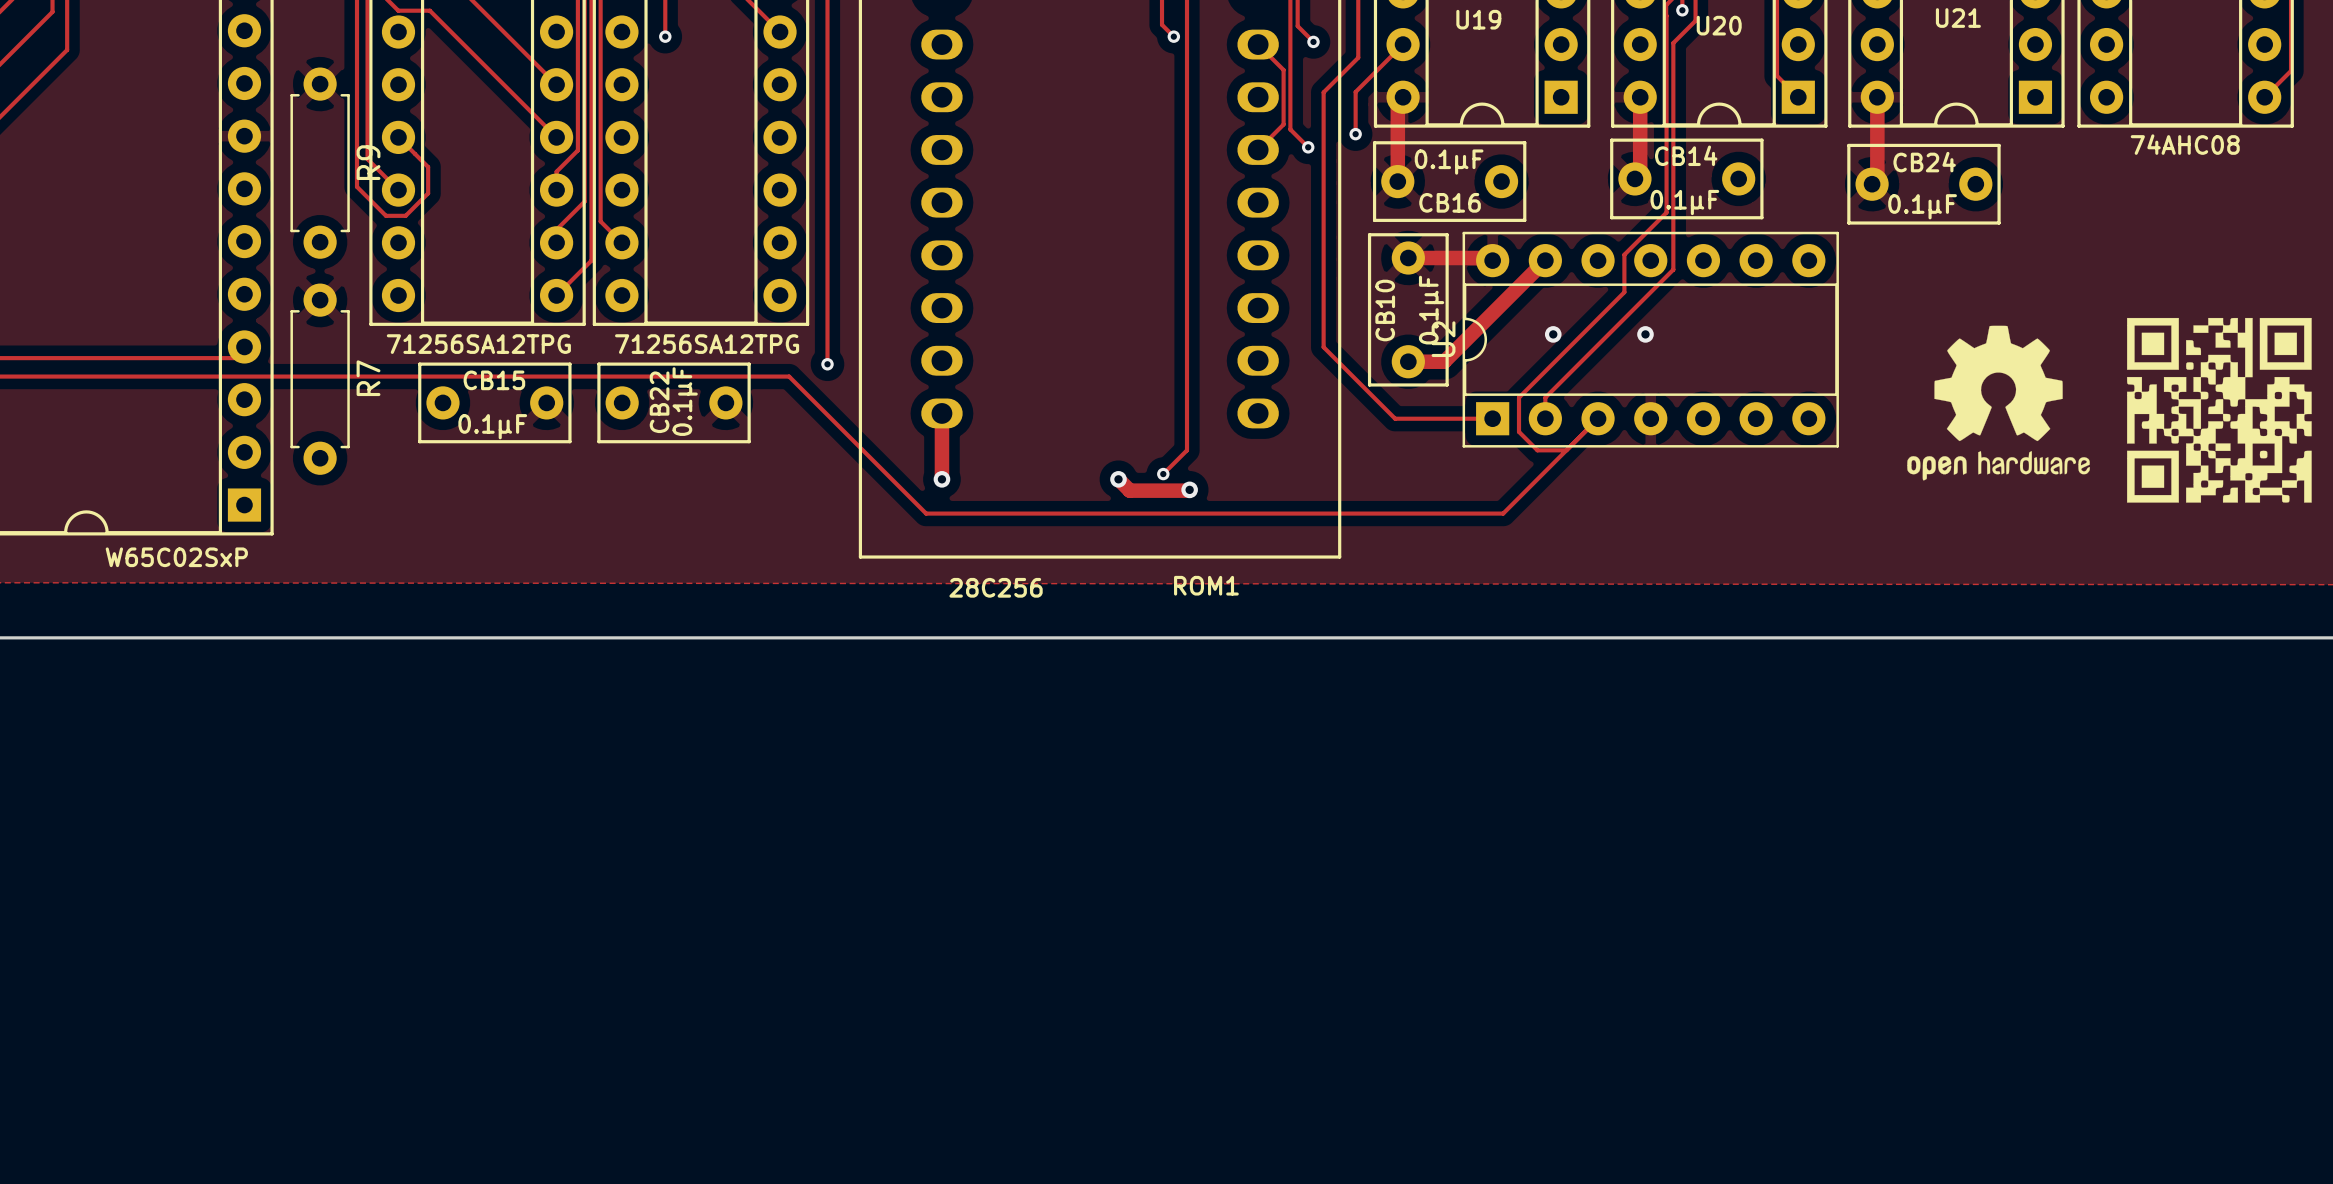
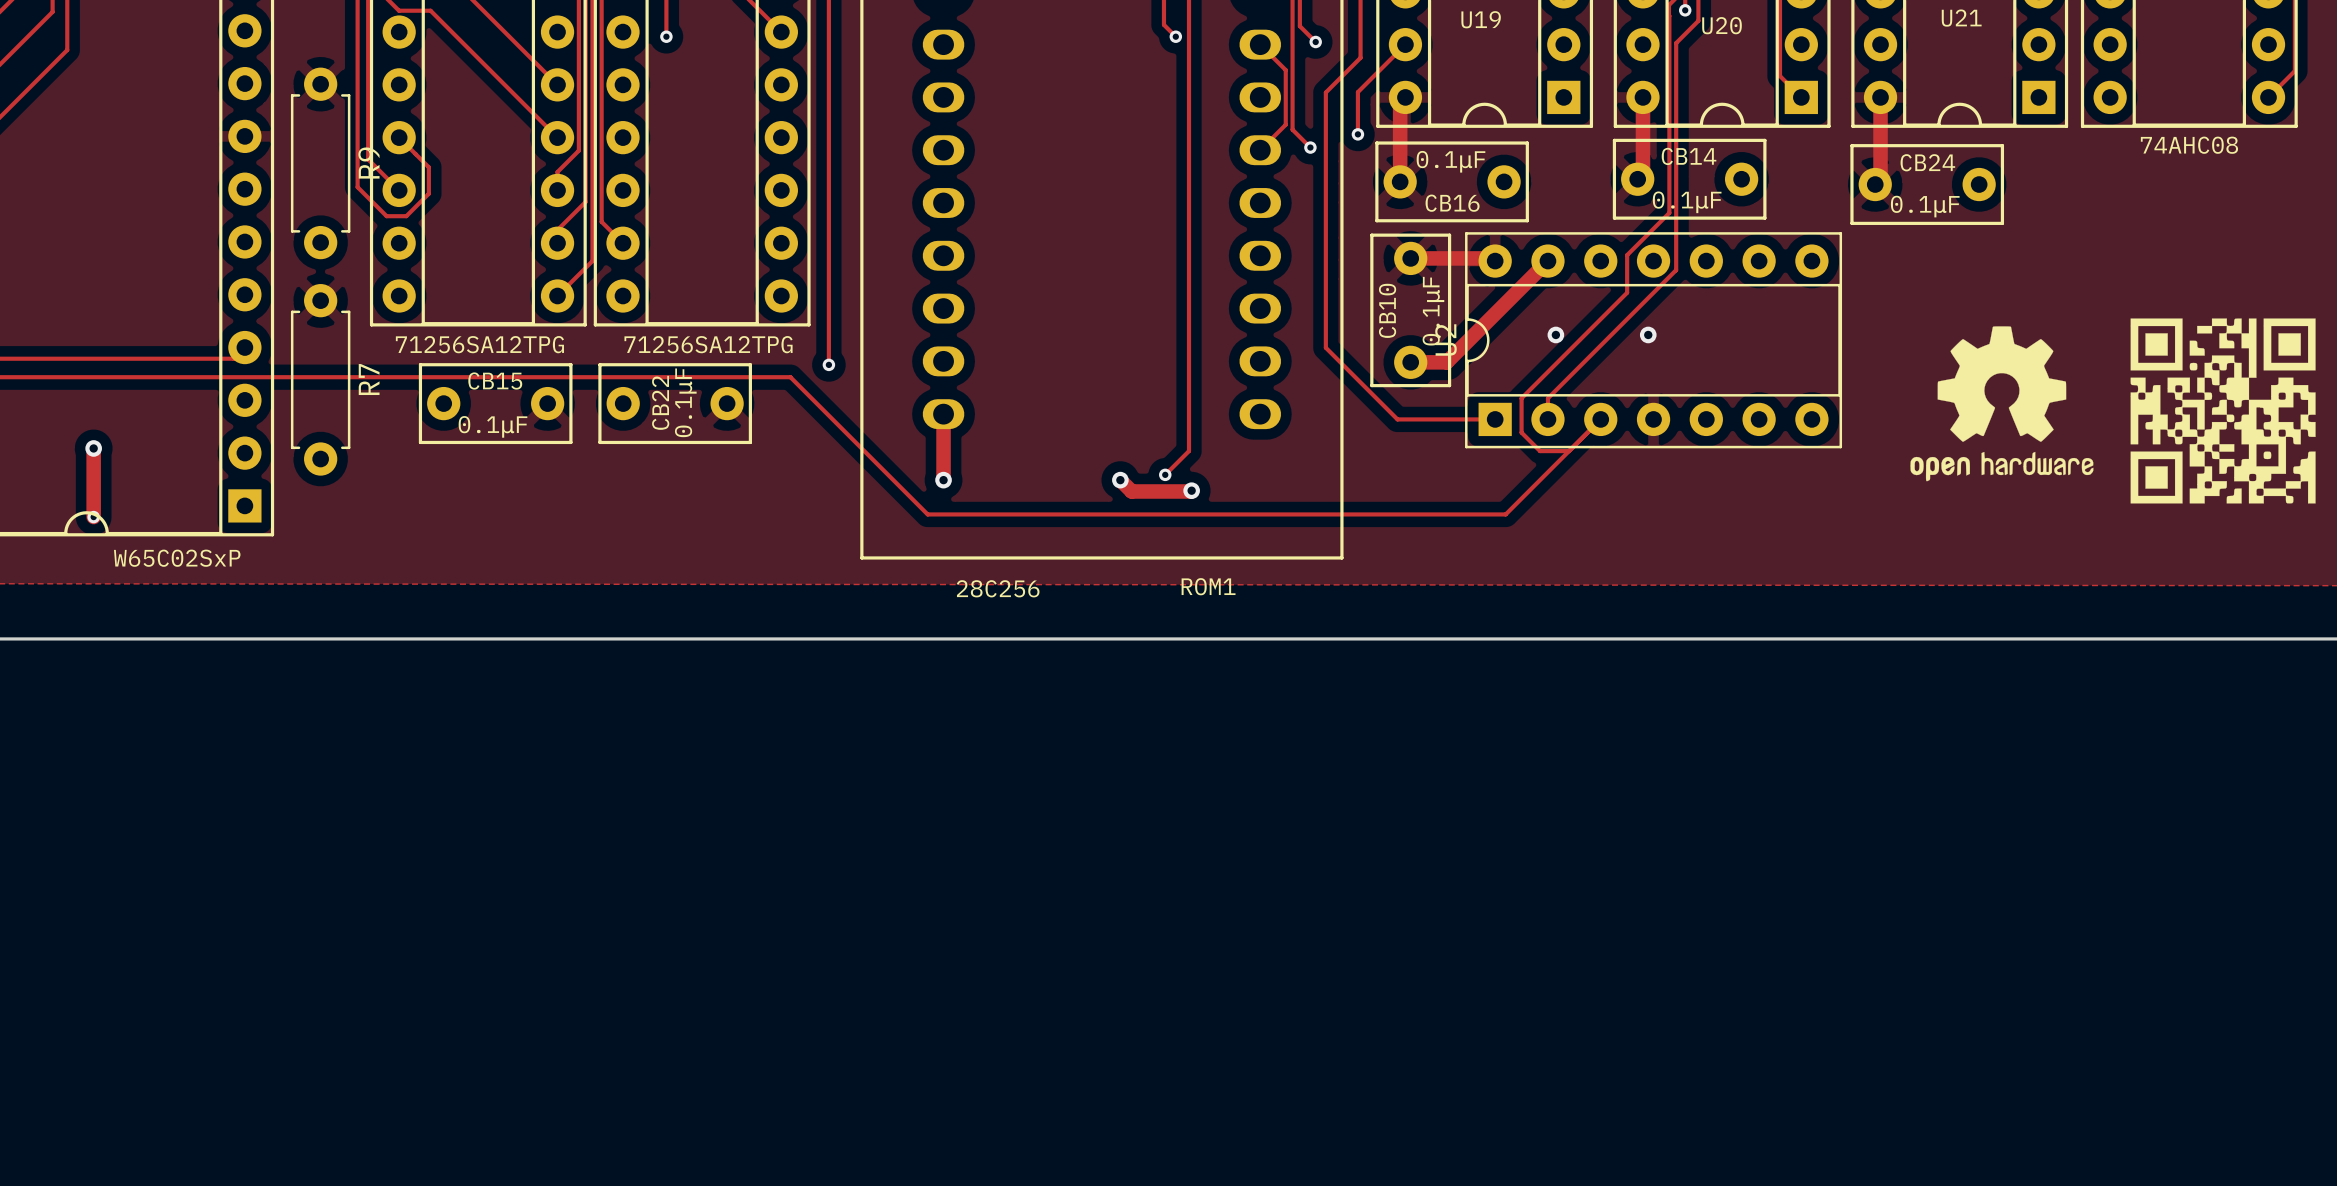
track: none -> (93, 448) (93, 517)
via: none -> (93, 448)
via: none -> (93, 517)

